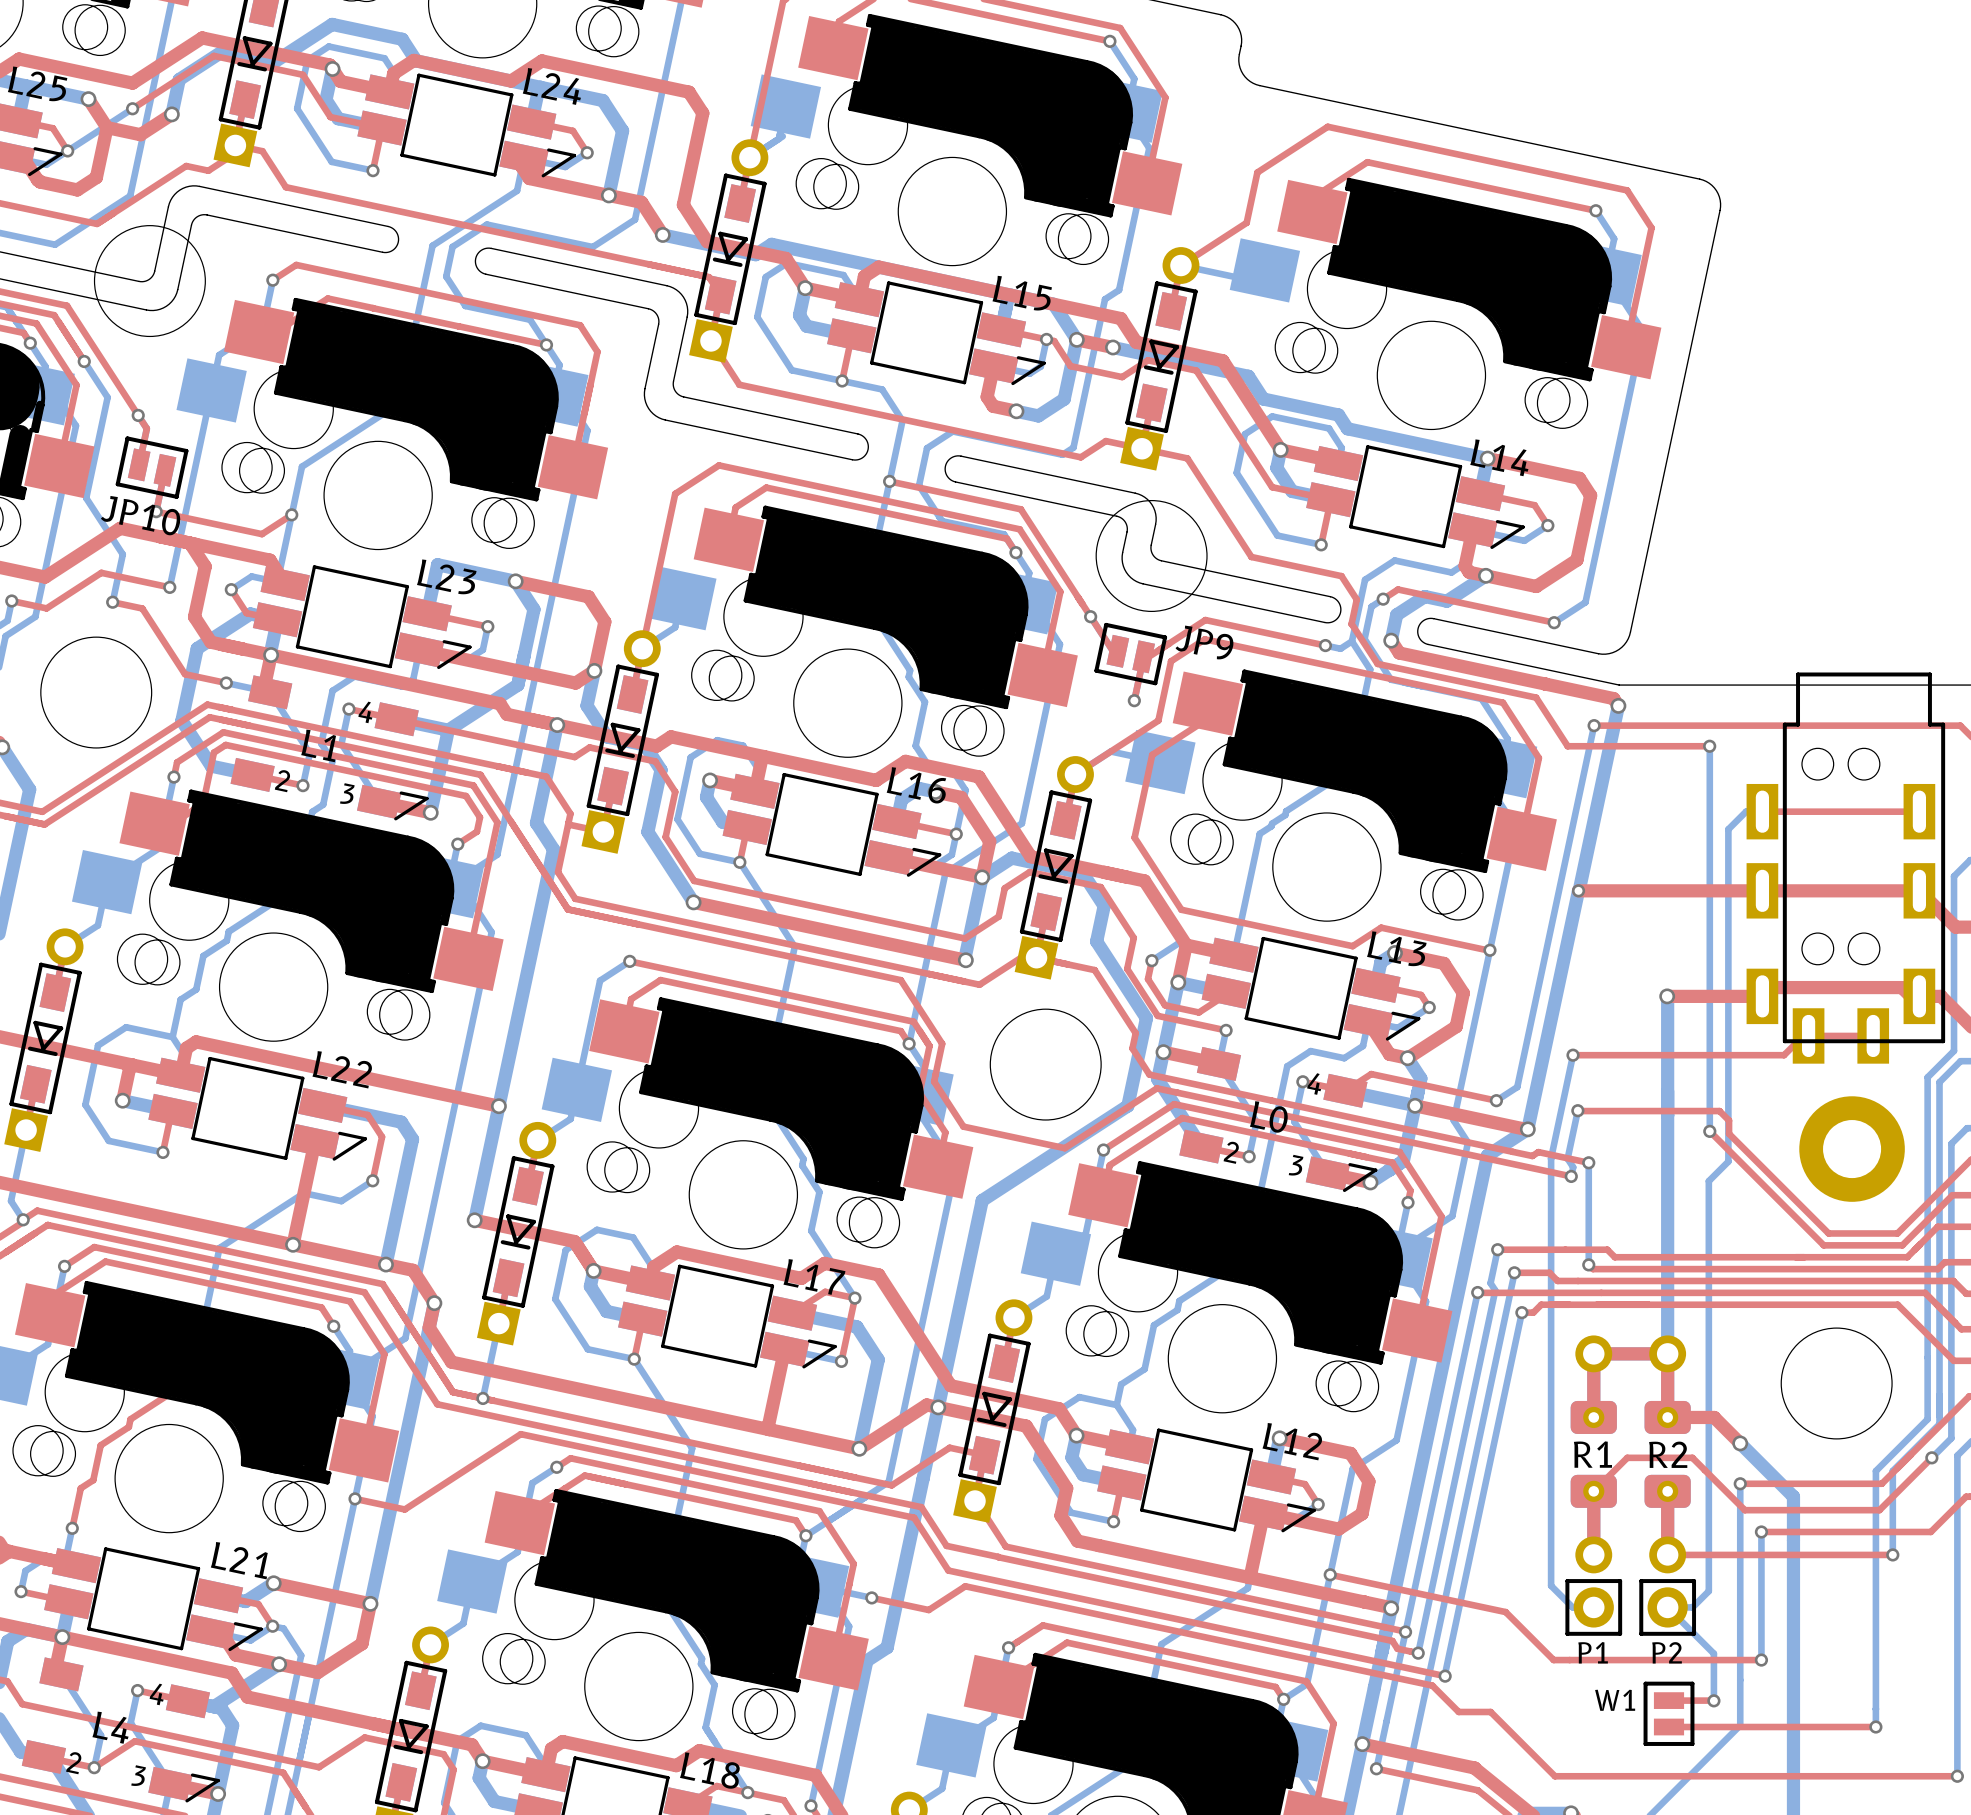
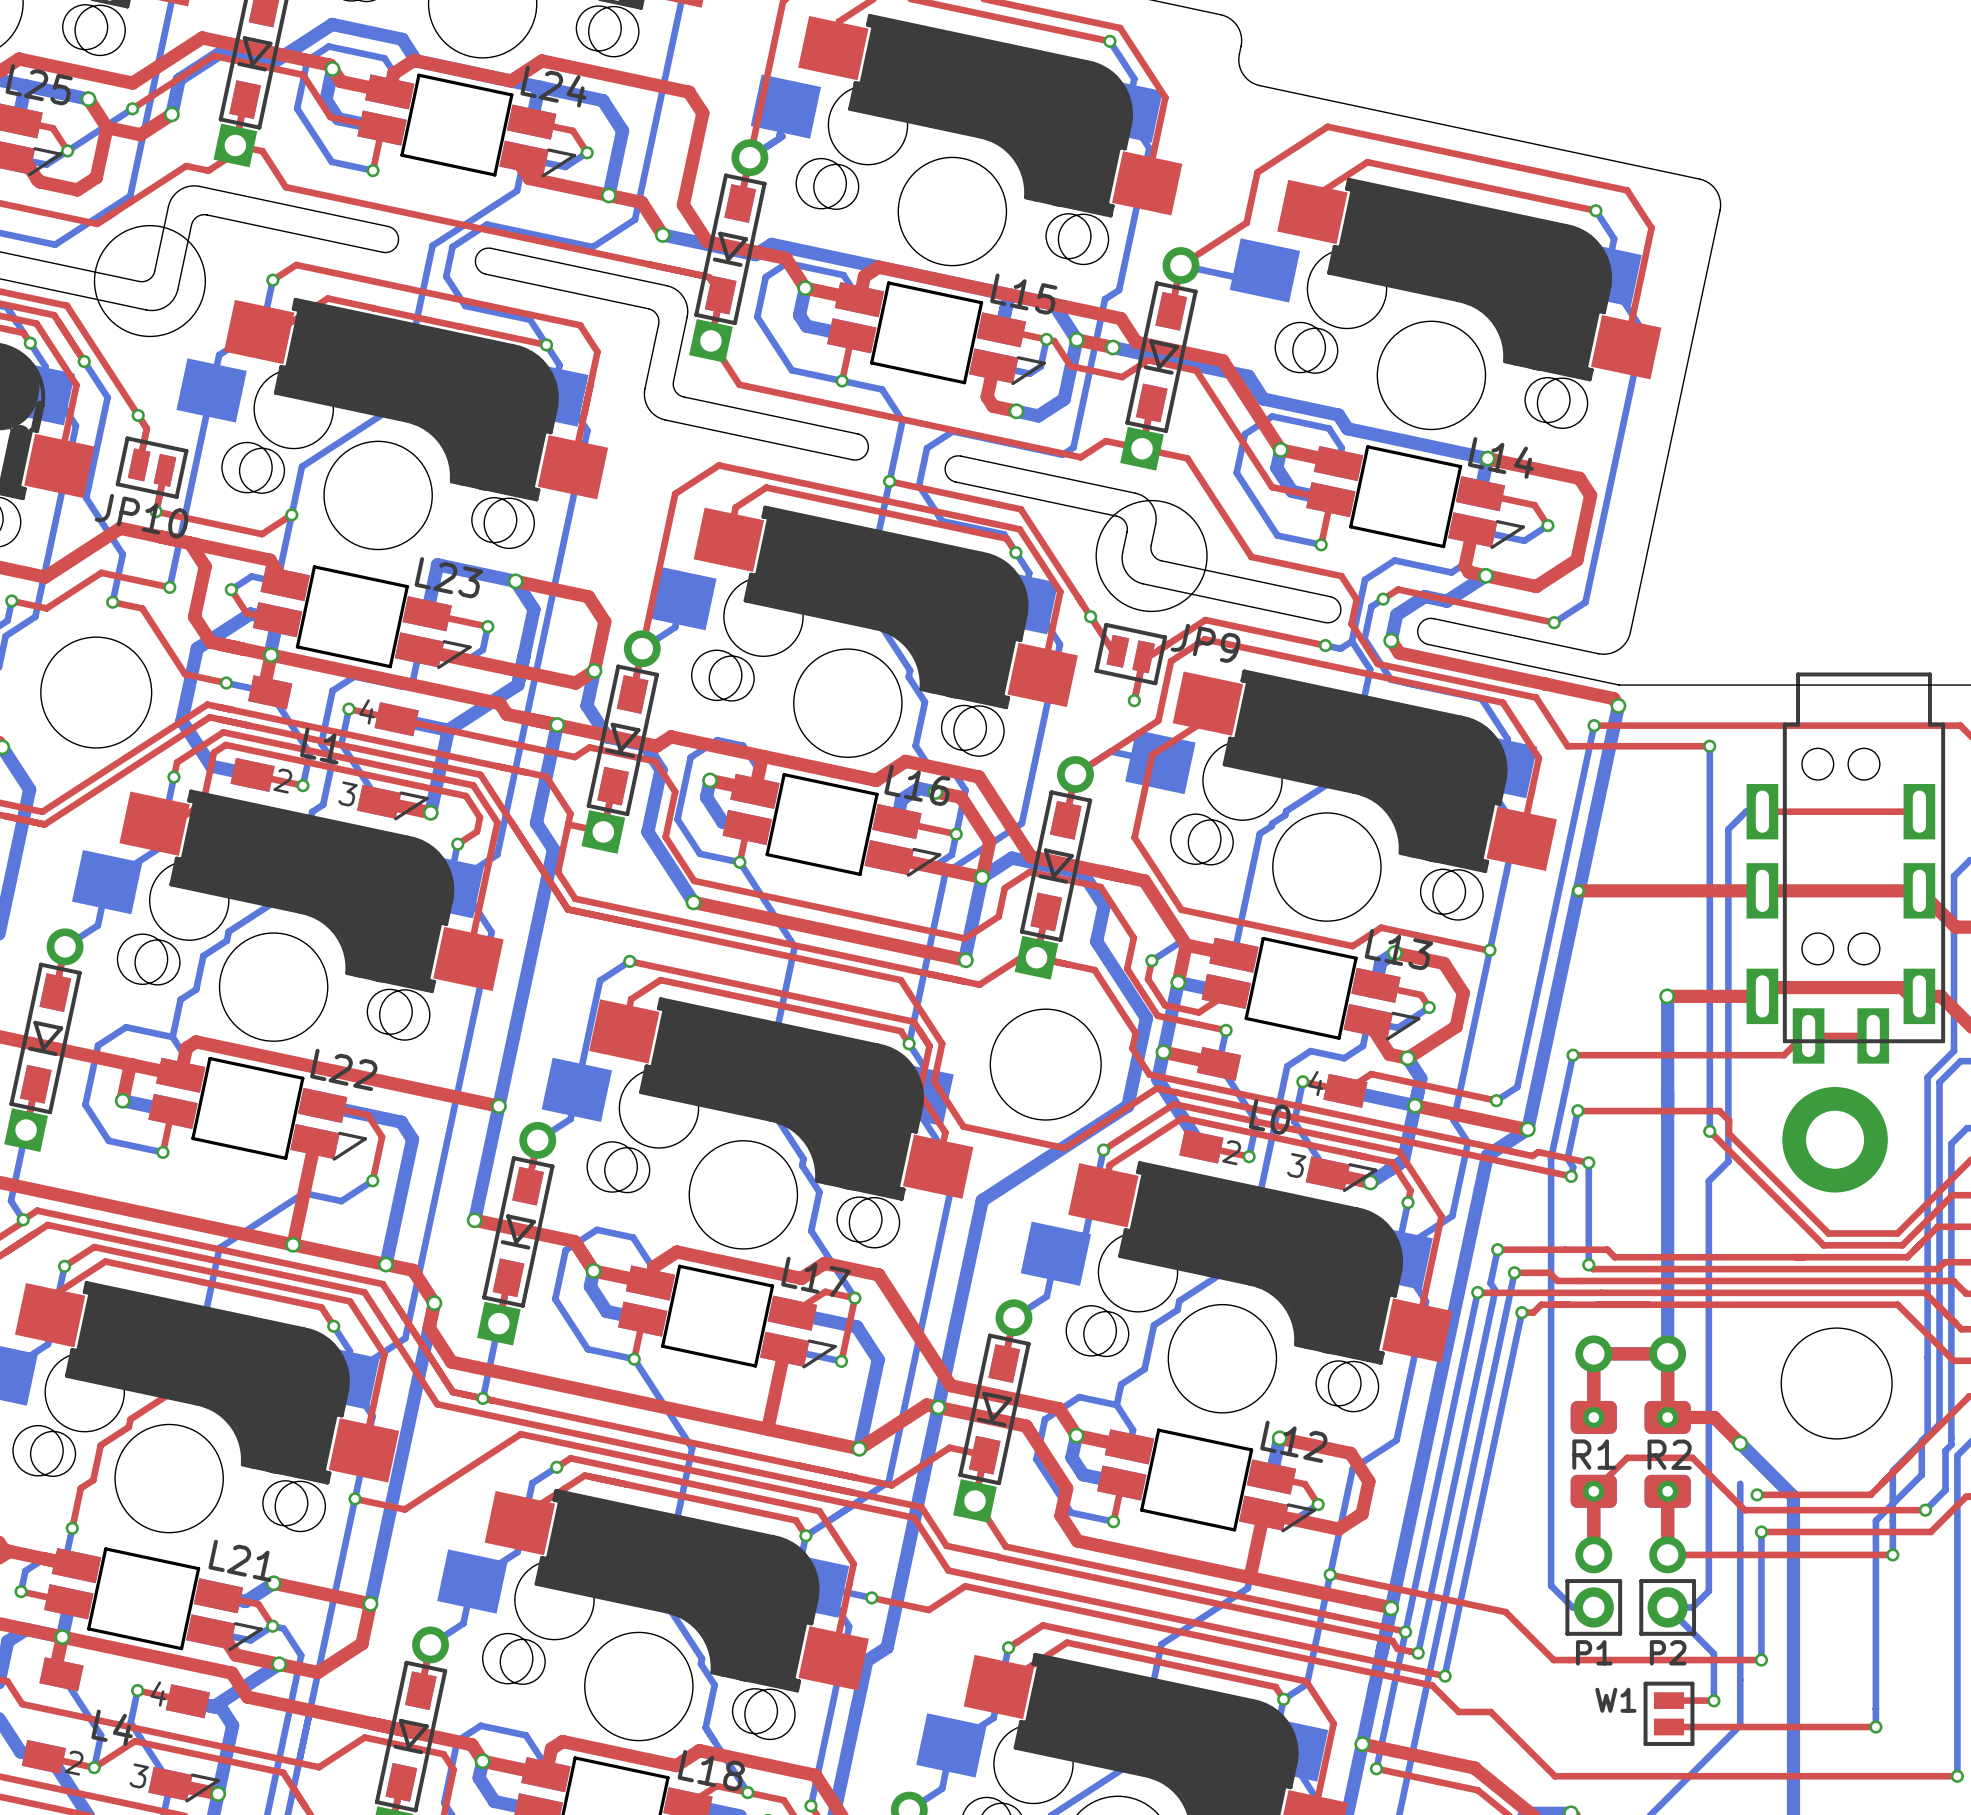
part position: (1852, 1149) -> (1835, 1139)
bottom track: (1927, 1419) (1875, 1471) (1875, 1520) -> (1927, 1419) (1927, 1434) (1921, 1440) (1921, 1474) (1875, 1520)
bottom track: (1951, 1438) (1931, 1457) -> (1951, 1438) (1951, 1444) (1945, 1450) (1945, 1490) (1925, 1510)
top track: (1931, 1457) (1879, 1510) -> (1925, 1510) (1879, 1510)
via position: (1931, 1457) -> (1925, 1510)
top track: (1740, 1483) (1881, 1483) -> (1757, 1494) (1870, 1494) (1881, 1483)
via position: (1740, 1483) -> (1757, 1494)

